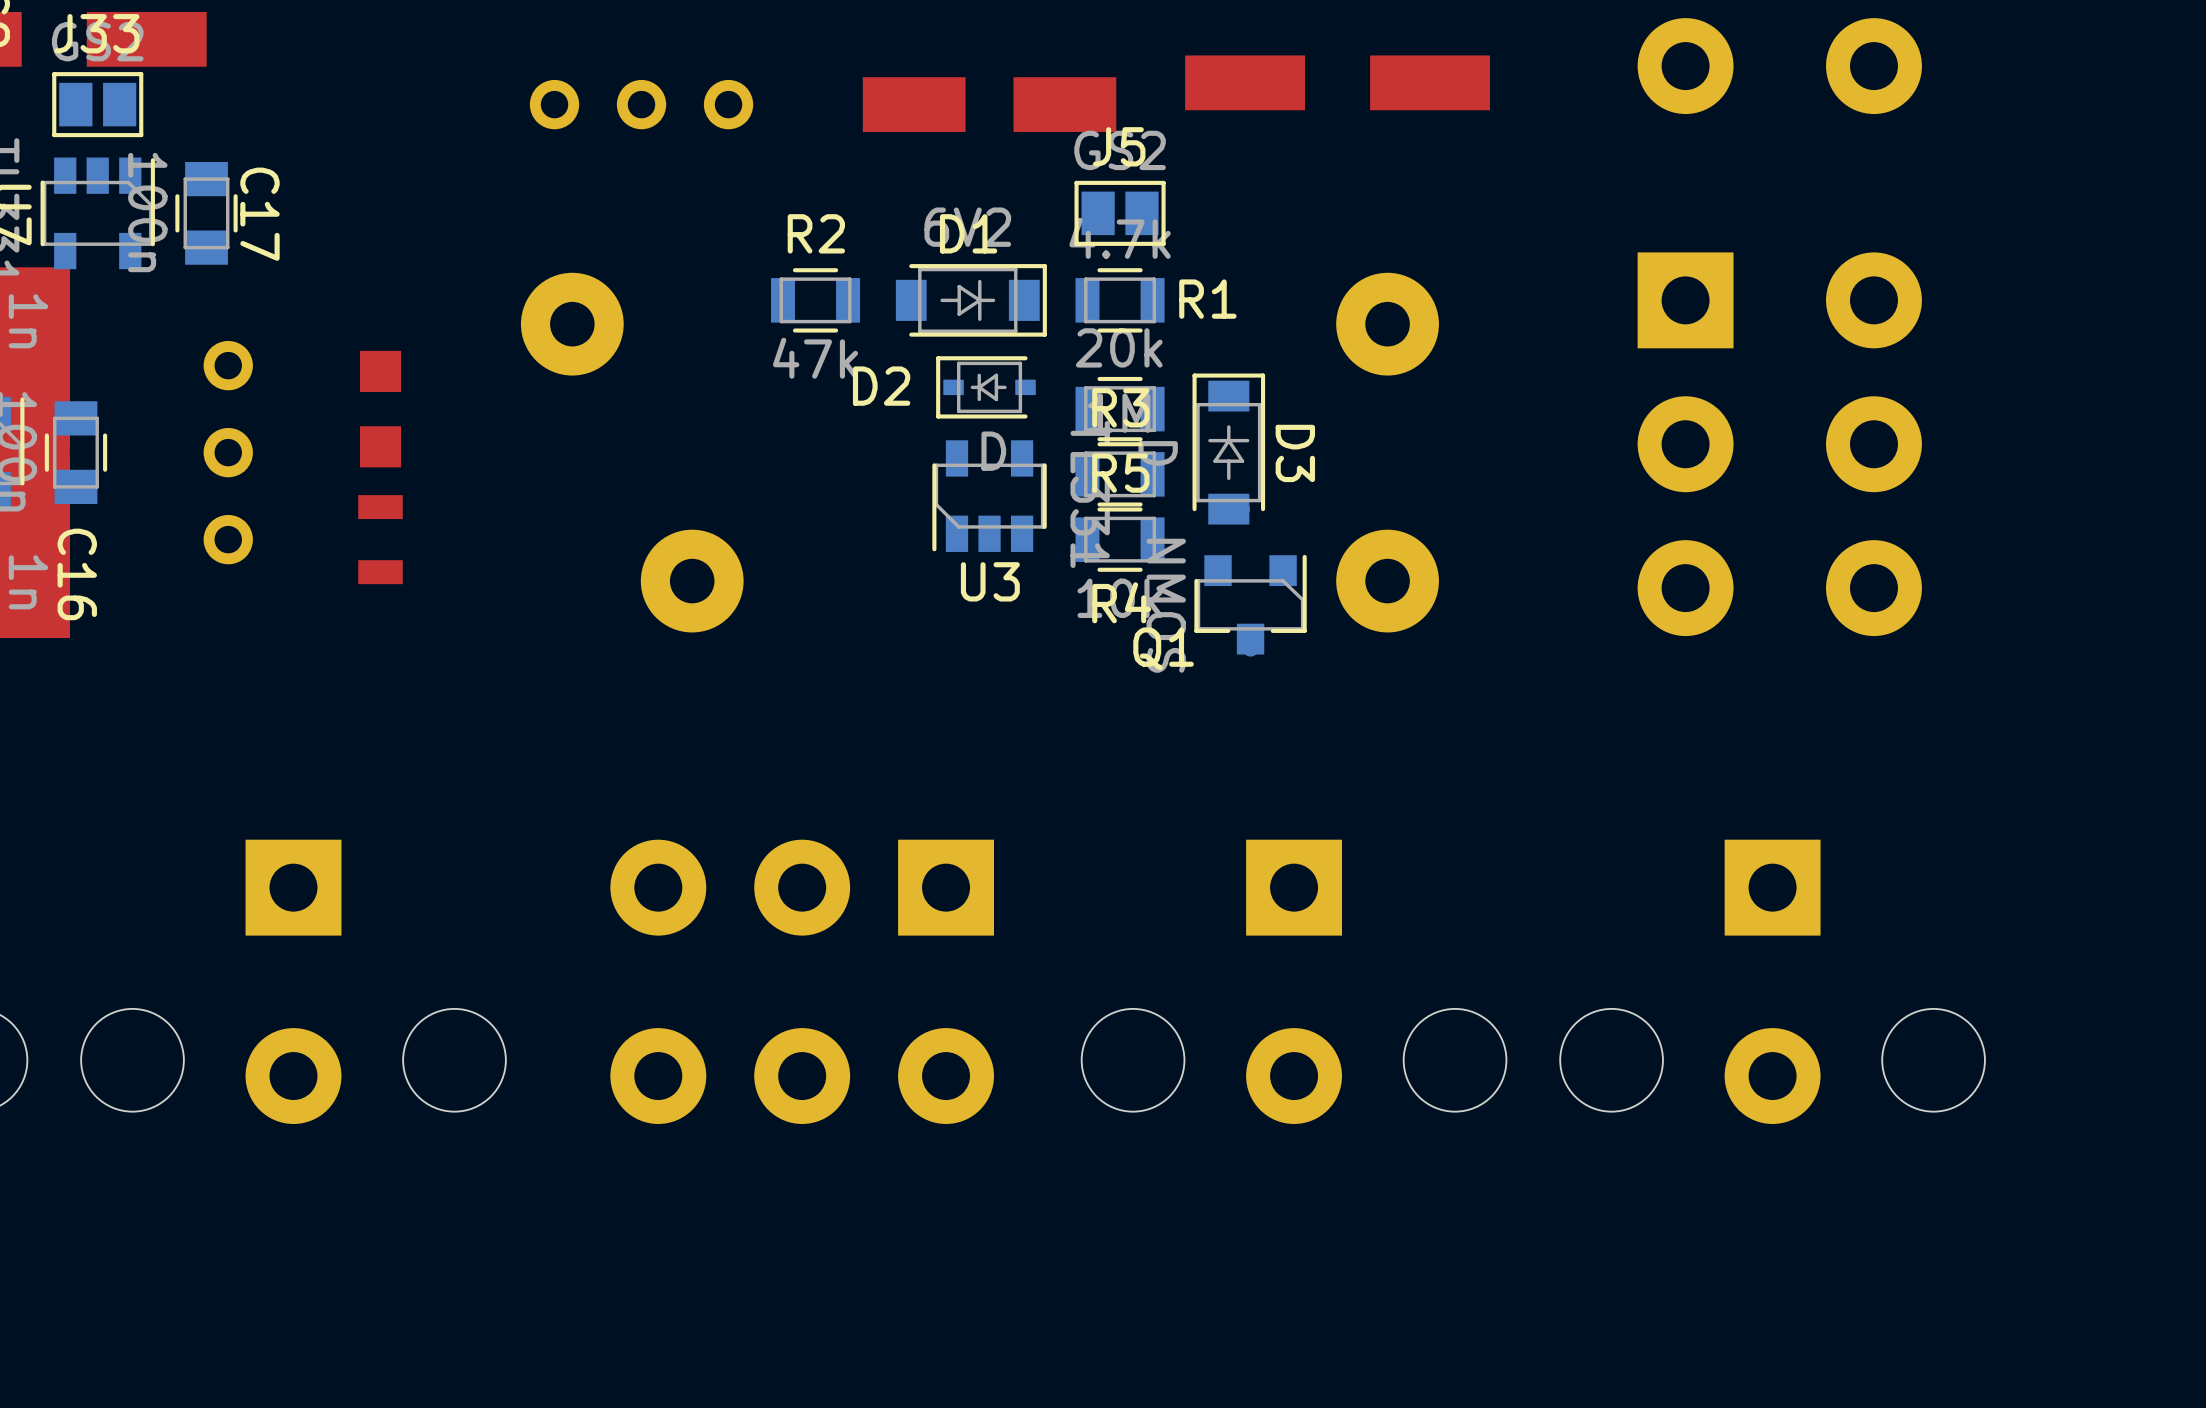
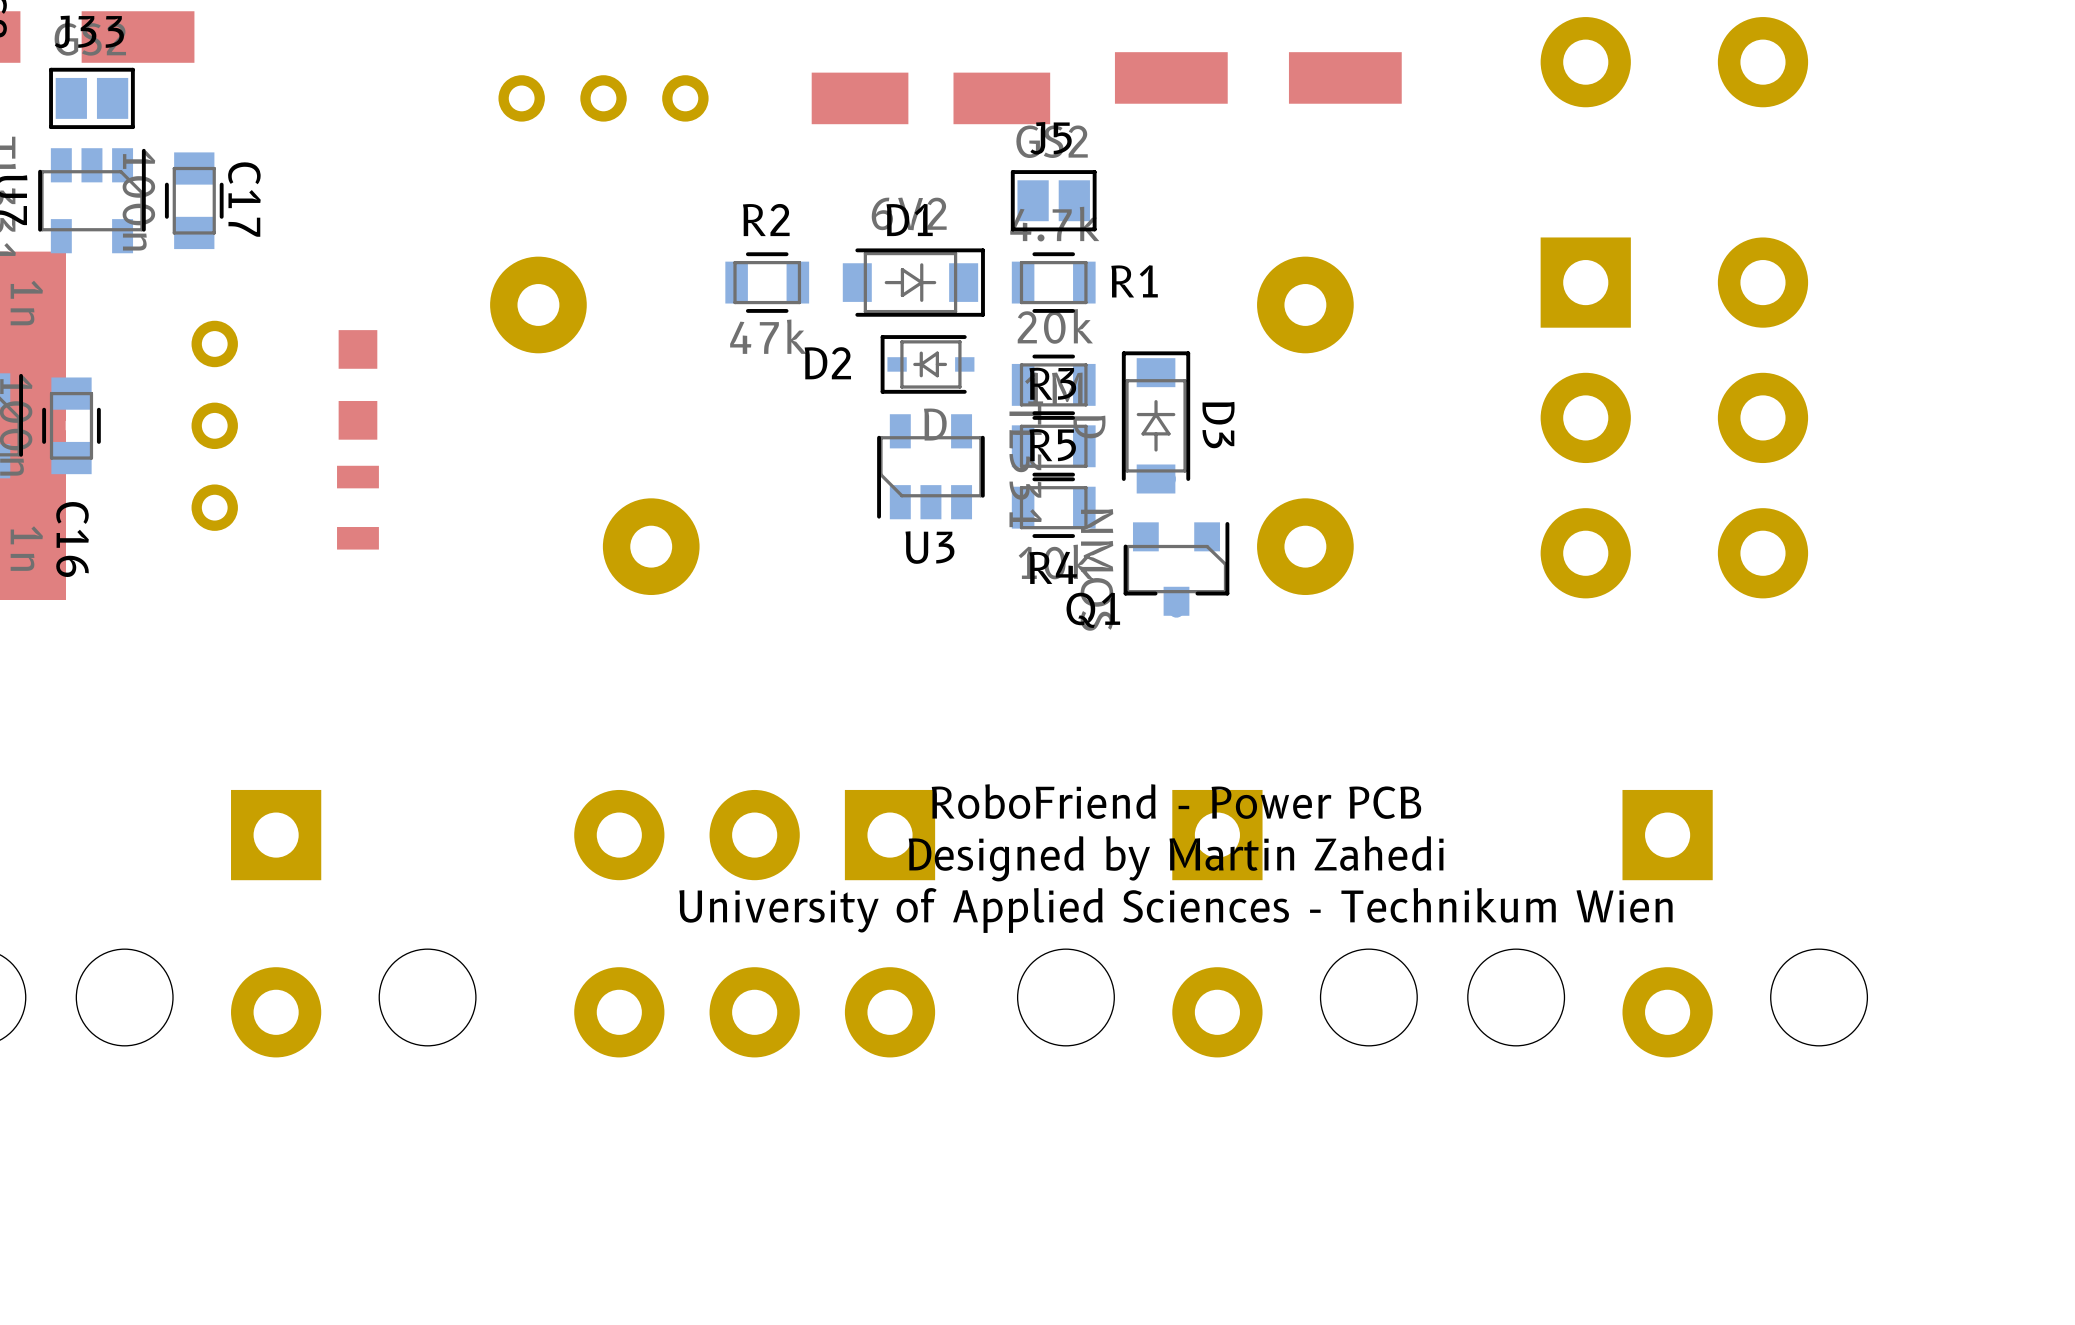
text: none -> RoboFriend - Power PCB (1176, 801)
text: none -> Designed by Martin Zahedi (1176, 858)
text: none -> University of Applied Sciences - Technikum Wien (1175, 910)

